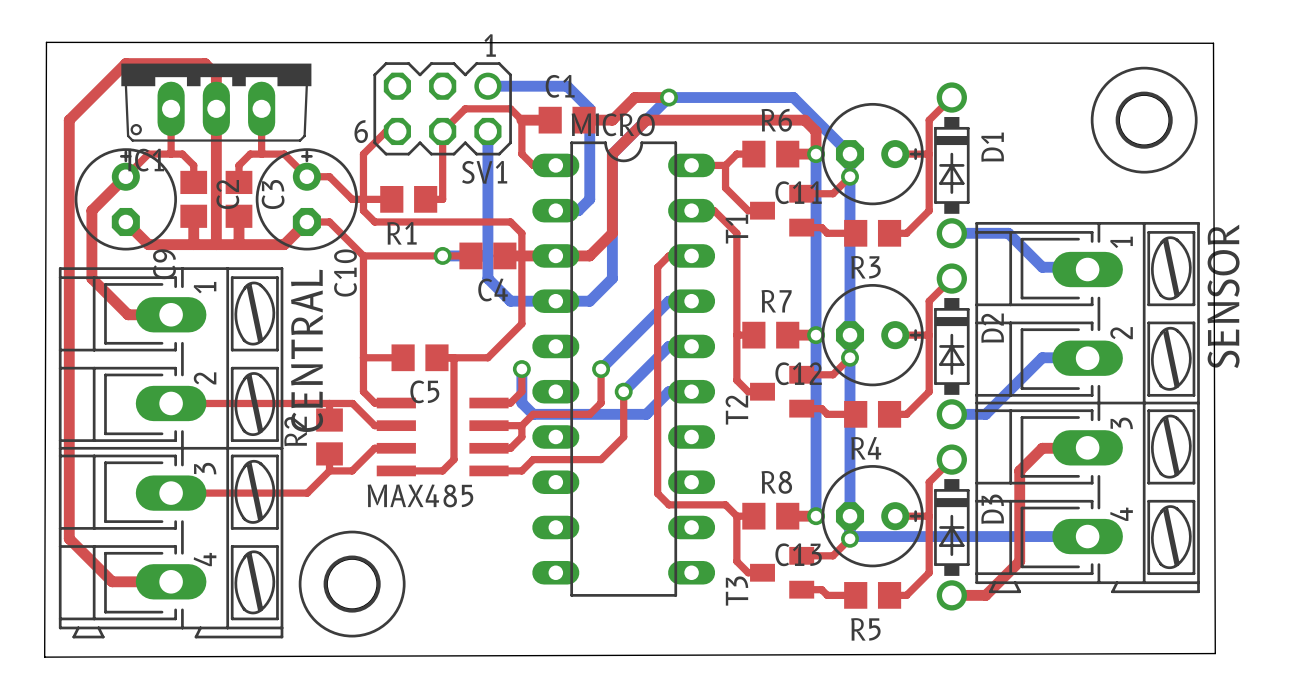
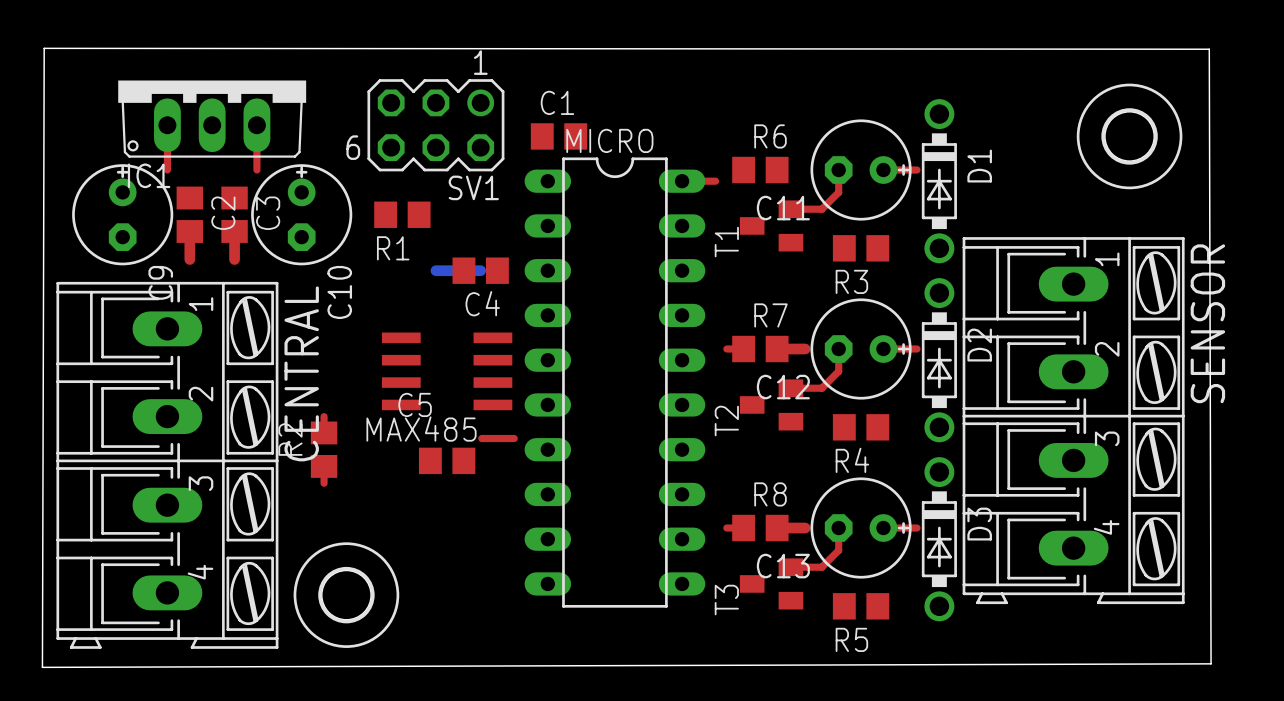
board edge: (46, 42) (1213, 43) (1215, 653) -> (44, 59) (44, 48) (1209, 49) (1211, 663) (1199, 663)
bottom track: (487, 86) (567, 86) (589, 108) (589, 199) (578, 210) (555, 210) -> none
top track: (668, 97) (635, 97) (612, 120) (584, 120) -> none
via: (668, 97) -> none
top track: (951, 97) (929, 120) (929, 210) (906, 233) (889, 233) -> none
top track: (521, 120) (521, 154) (533, 165) (555, 165) -> none
top track: (521, 120) (510, 108) (465, 108) (442, 131) (442, 199) (425, 199) -> none
top track: (521, 120) (550, 120) -> none
top track: (397, 131) (386, 131) (363, 154) (363, 210) (374, 221) (510, 221) (521, 233) (521, 323) (487, 357) (436, 357) -> none
bottom track: (487, 131) (487, 278) (510, 301) (589, 301) (612, 278) (612, 154) (668, 97) (793, 97) (850, 154) (850, 538) (852, 536) (1087, 536) -> none
top track: (753, 154) (736, 154) (725, 165) (725, 188) (748, 210) (762, 210) -> none
top track: (787, 154) (816, 154) (816, 131) (804, 120) (646, 120) (612, 154) (612, 233) (589, 255) (504, 255) -> none
bottom track: (816, 154) (816, 516) -> none
via: (816, 154) -> none
via: (850, 176) -> none
top track: (193, 182) (193, 165) (182, 154) (148, 154) (91, 210) (91, 278) (128, 314) (171, 314) -> none
top track: (238, 182) (238, 165) (250, 154) (284, 154) (306, 176) (329, 176) (352, 199) (391, 199) -> none
top track: (691, 210) (714, 210) (736, 233) (736, 380) (748, 391) (762, 391) -> none
top track: (125, 221) (148, 244) (284, 244) (306, 221) (329, 221) (363, 255) -> none
top track: (801, 227) (821, 227) (827, 233) (855, 233) -> none
bottom track: (951, 233) (1008, 233) (1042, 267) (1085, 267) (1087, 269) -> none
top track: (216, 244) (216, 74) (205, 63) (125, 63) (69, 120) (69, 538) (112, 581) (171, 581) -> none
top track: (363, 255) (363, 391) (374, 403) (396, 403) -> none
top track: (363, 255) (470, 255) -> none
via: (442, 255) -> none
top track: (691, 255) (668, 255) (657, 267) (657, 493) (668, 504) (725, 504) (736, 516) (736, 561) (748, 572) (762, 572) -> none
top track: (951, 278) (929, 301) (929, 391) (906, 414) (889, 414) -> none
bottom track: (691, 301) (668, 301) (601, 369) -> none
via: (816, 335) -> none
bottom track: (691, 346) (668, 346) (623, 391) -> none
top track: (363, 357) (403, 357) -> none
C5 position: (420, 357) -> (447, 460)
top track: (453, 357) (453, 459) (442, 470) (396, 470) -> none
via: (850, 357) -> none
bottom track: (1087, 358) (1042, 357) (985, 414) (951, 414) -> none
top track: (521, 369) (521, 391) (510, 403) (488, 403) -> none
bottom track: (521, 369) (521, 403) (533, 414) (646, 414) (668, 391) (691, 391) -> none
via: (521, 369) -> none
top track: (601, 369) (601, 403) (589, 414) (533, 414) (521, 425) (521, 436) (510, 448) (488, 448) -> none
via: (601, 369) -> none
top track: (623, 391) (623, 436) (601, 459) (533, 459) (521, 470) (488, 470) -> none
via: (623, 391) -> none
top track: (171, 403) (352, 403) (374, 425) (396, 425) -> none
top track: (801, 408) (821, 408) (827, 414) (855, 414) -> none
MAX485 position: (442, 436) -> (447, 371)
top track: (1087, 447) (1042, 448) (1019, 470) (1019, 561) (985, 595) (951, 595) -> none
top track: (396, 448) (374, 448) (352, 470) (329, 470) (307, 493) (171, 493) -> none
top track: (951, 459) (929, 482) (929, 572) (906, 595) (889, 595) -> none
via: (816, 516) -> none
via: (850, 538) -> none
top track: (801, 589) (821, 589) (827, 595) (855, 595) -> none

